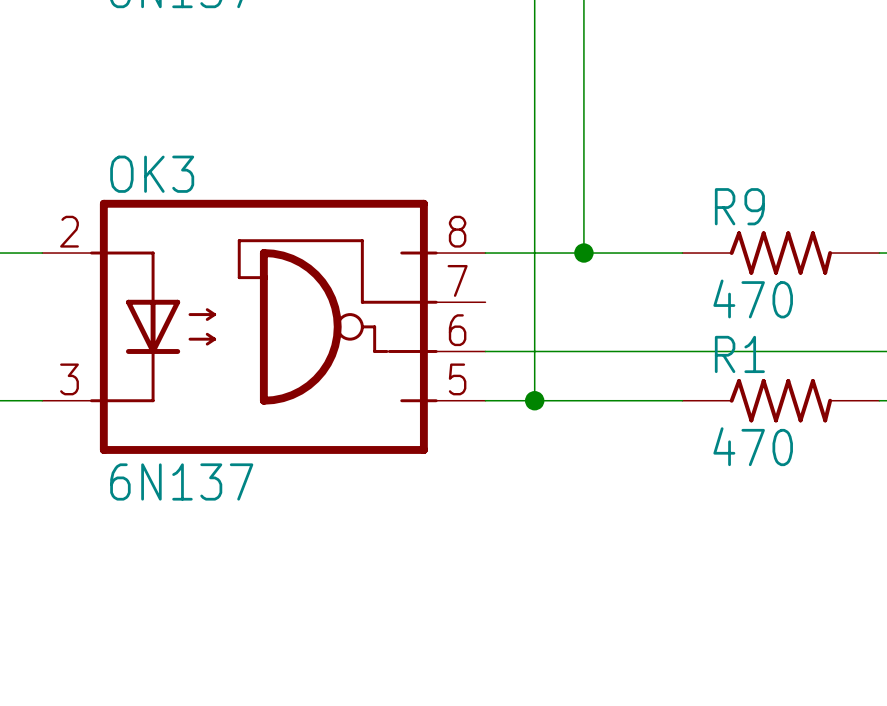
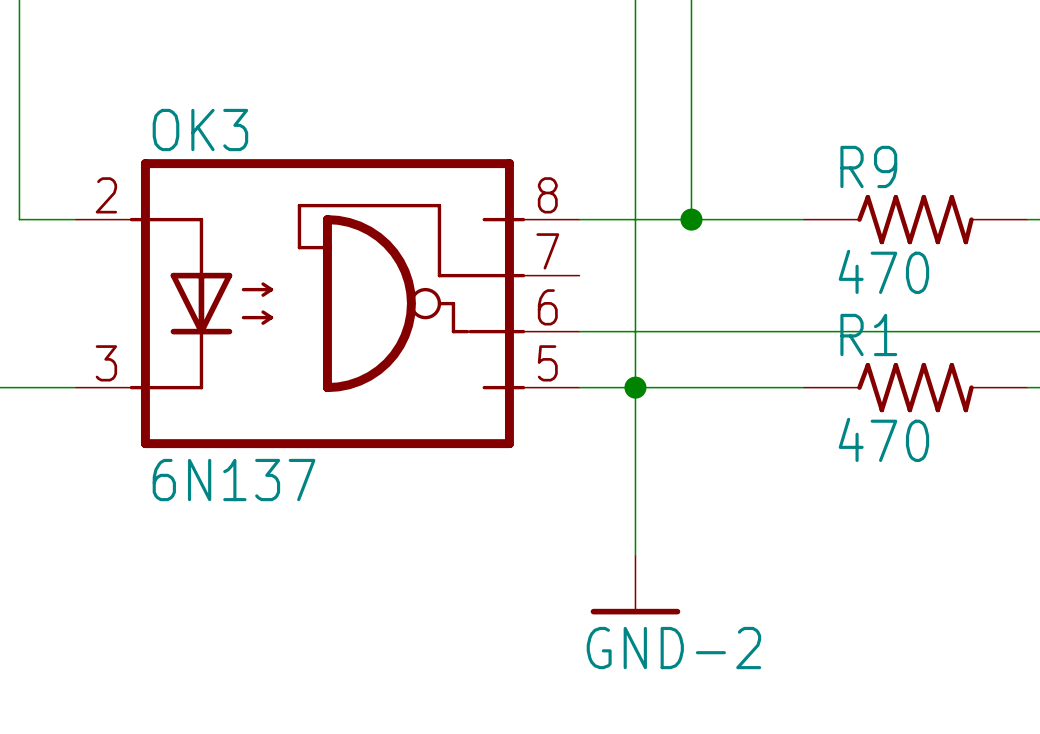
wire: none -> (635, 387) (635, 555)
power symbol: none -> GND-2 (635, 585)

